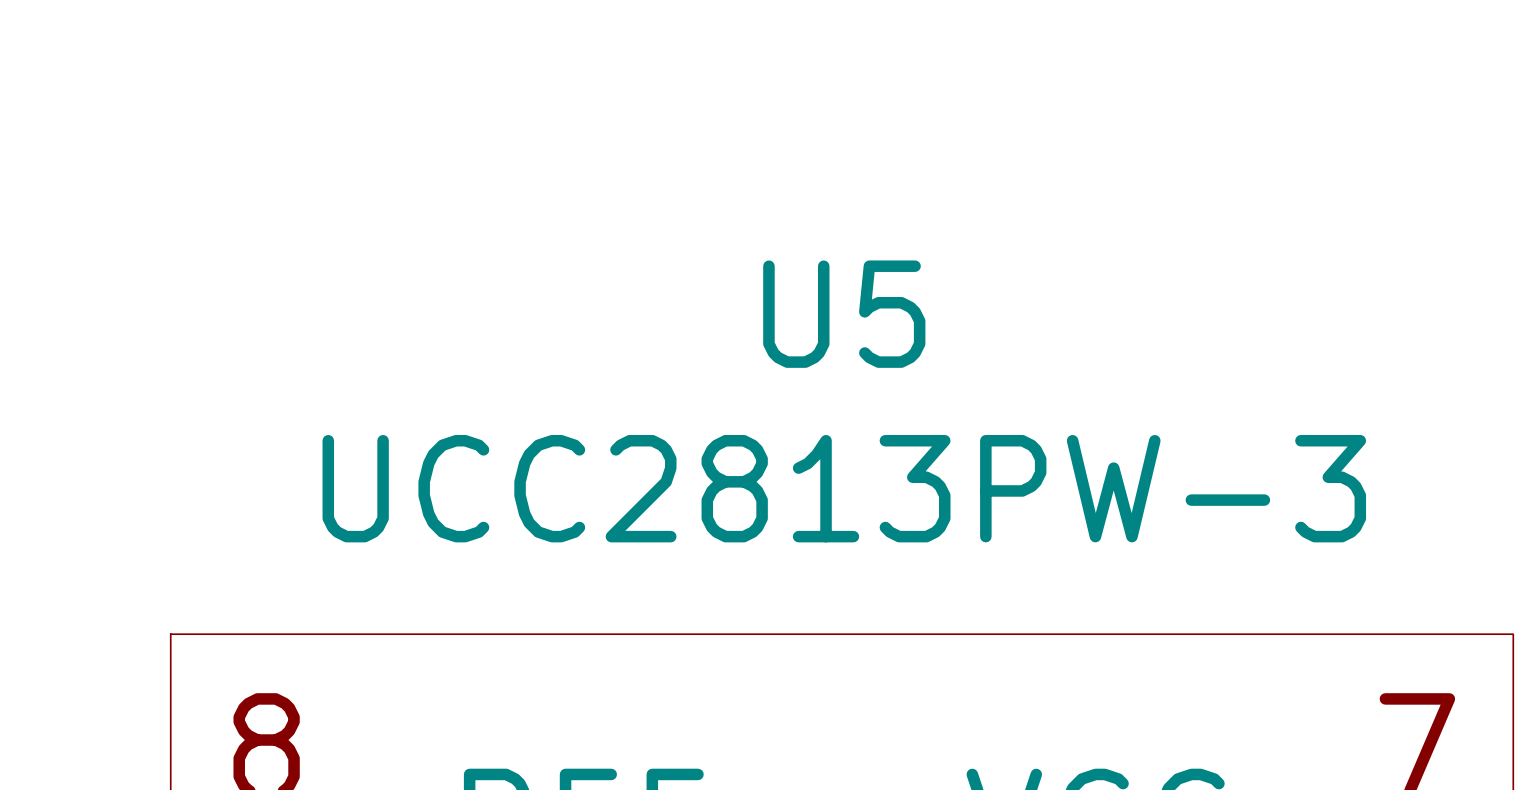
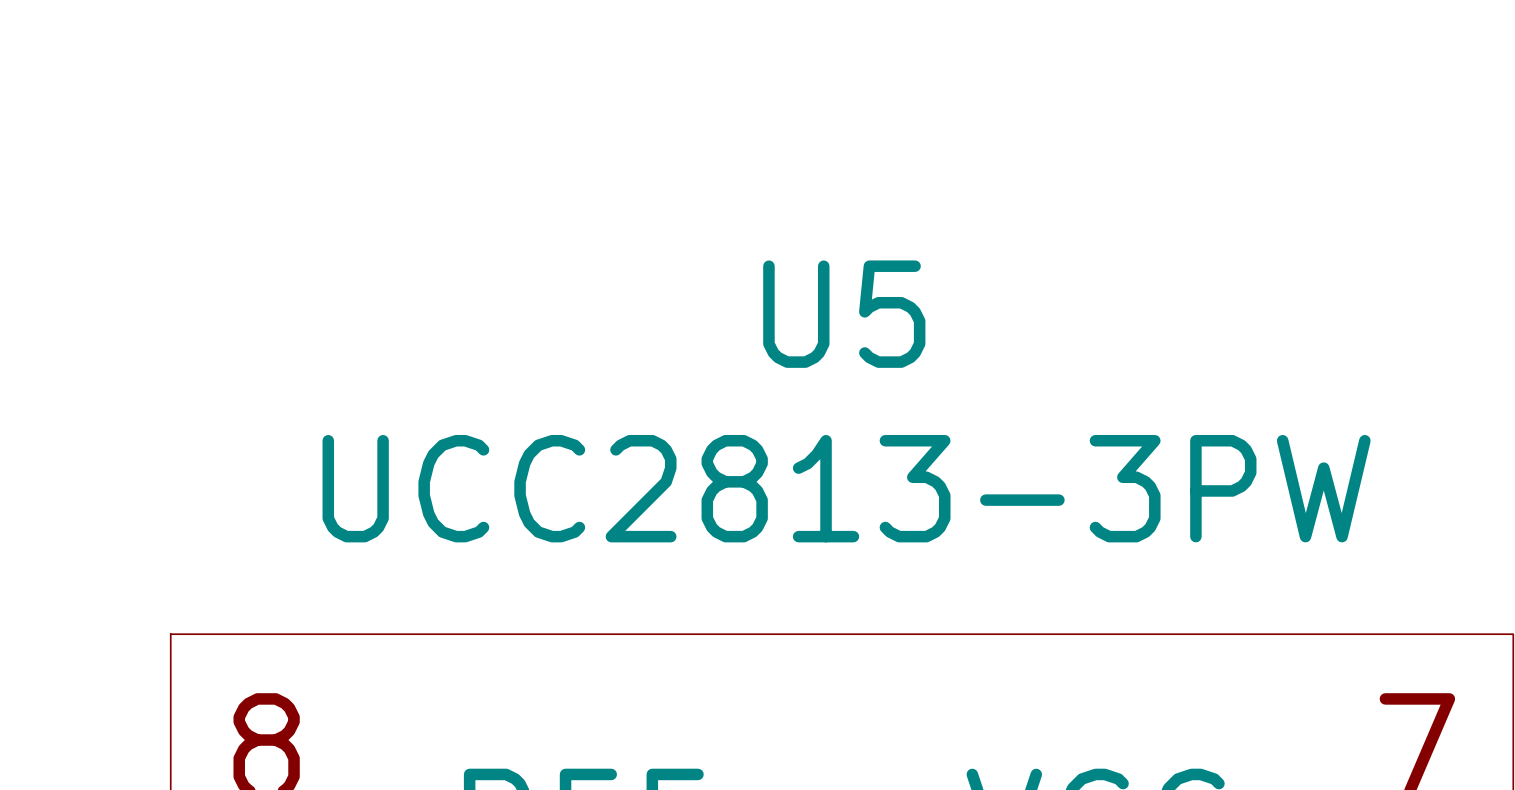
U5 value: UCC2813PW-3 (844, 488) -> UCC2813-3PW (846, 488)

